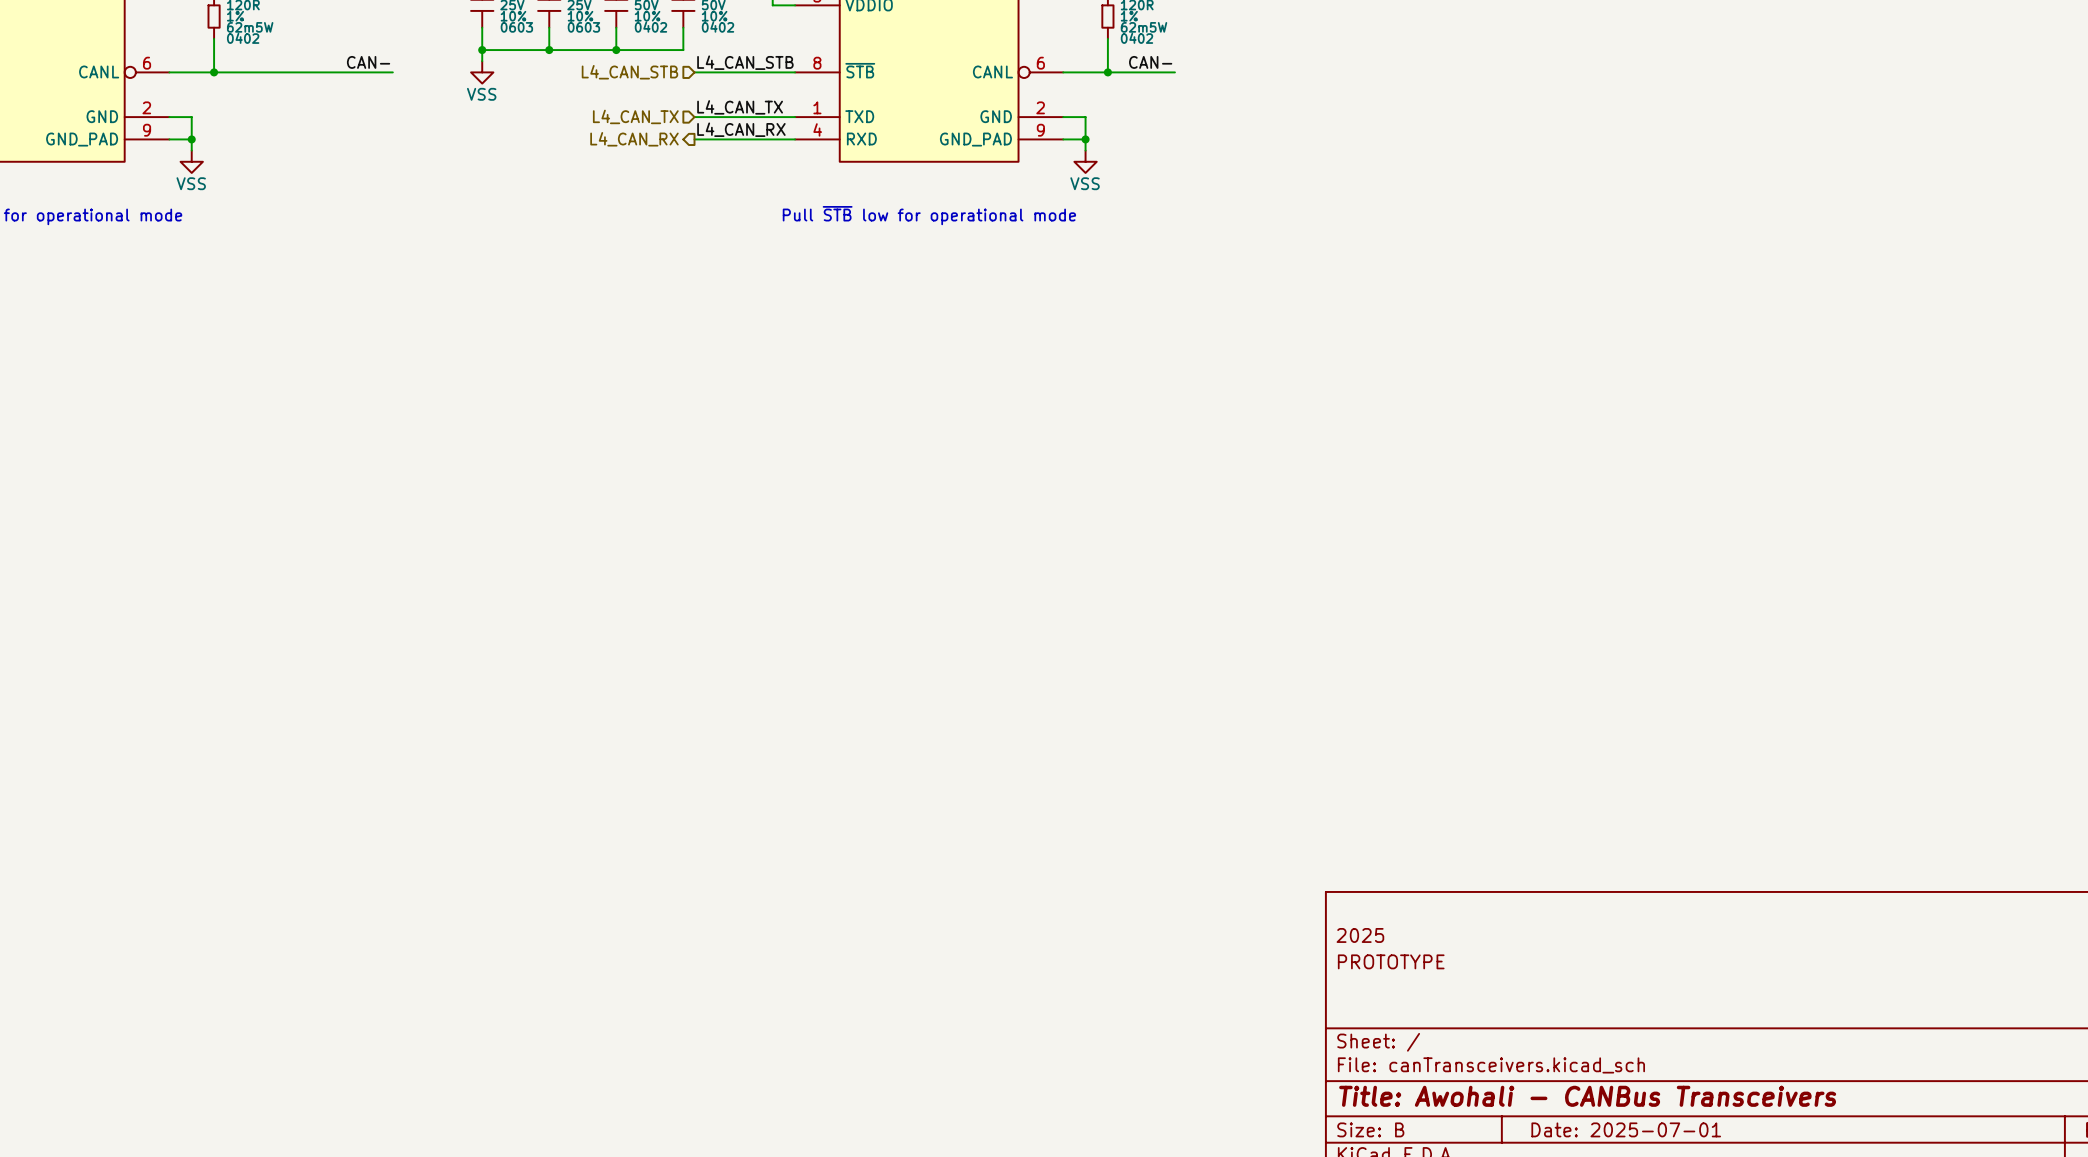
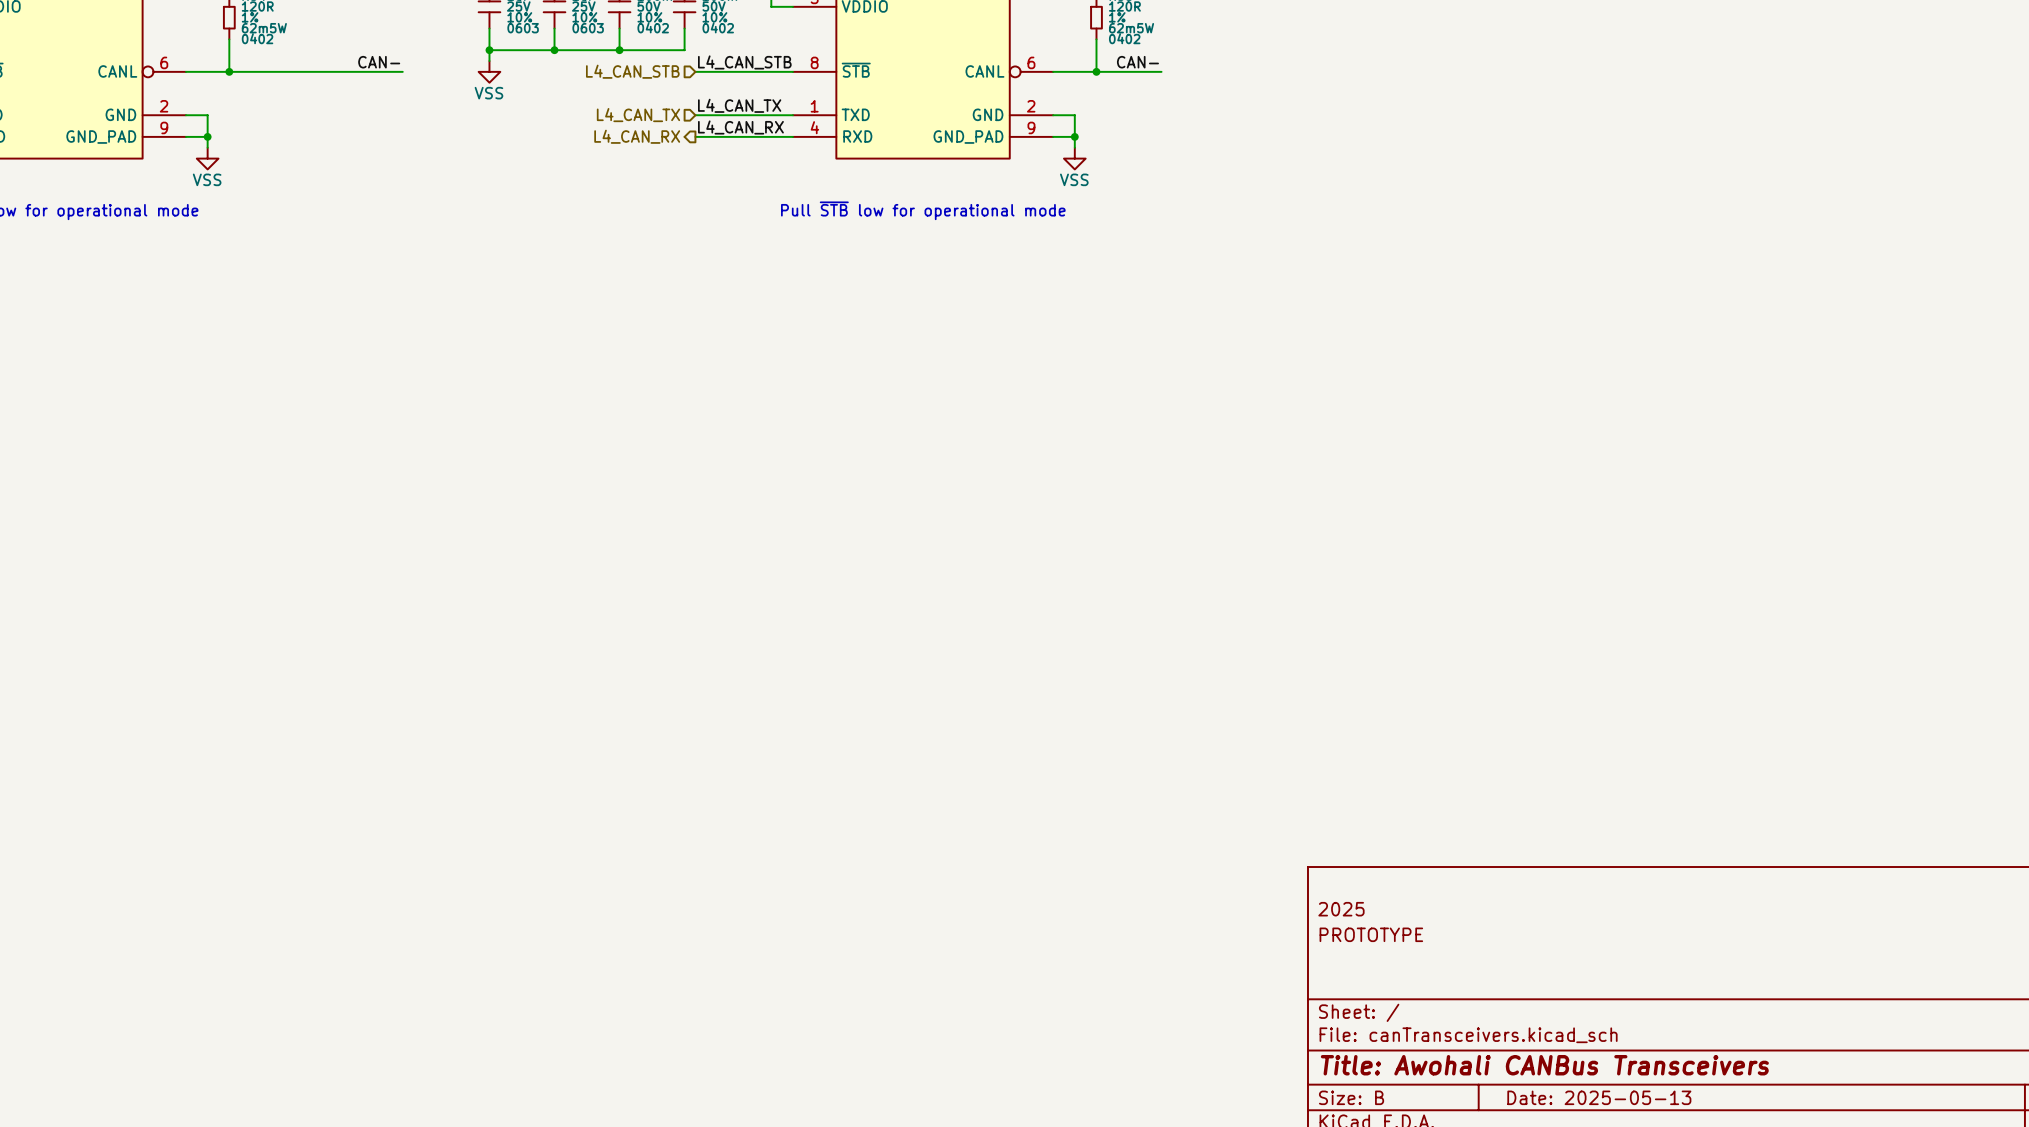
title block: Title: Awohali - CANBus Transceivers (1587, 1096) -> Title: Awohali CANBus Transceivers (1544, 1065)
title block: Date: 2025-07-01 (1626, 1129) -> Date: 2025-05-13 (1599, 1097)

